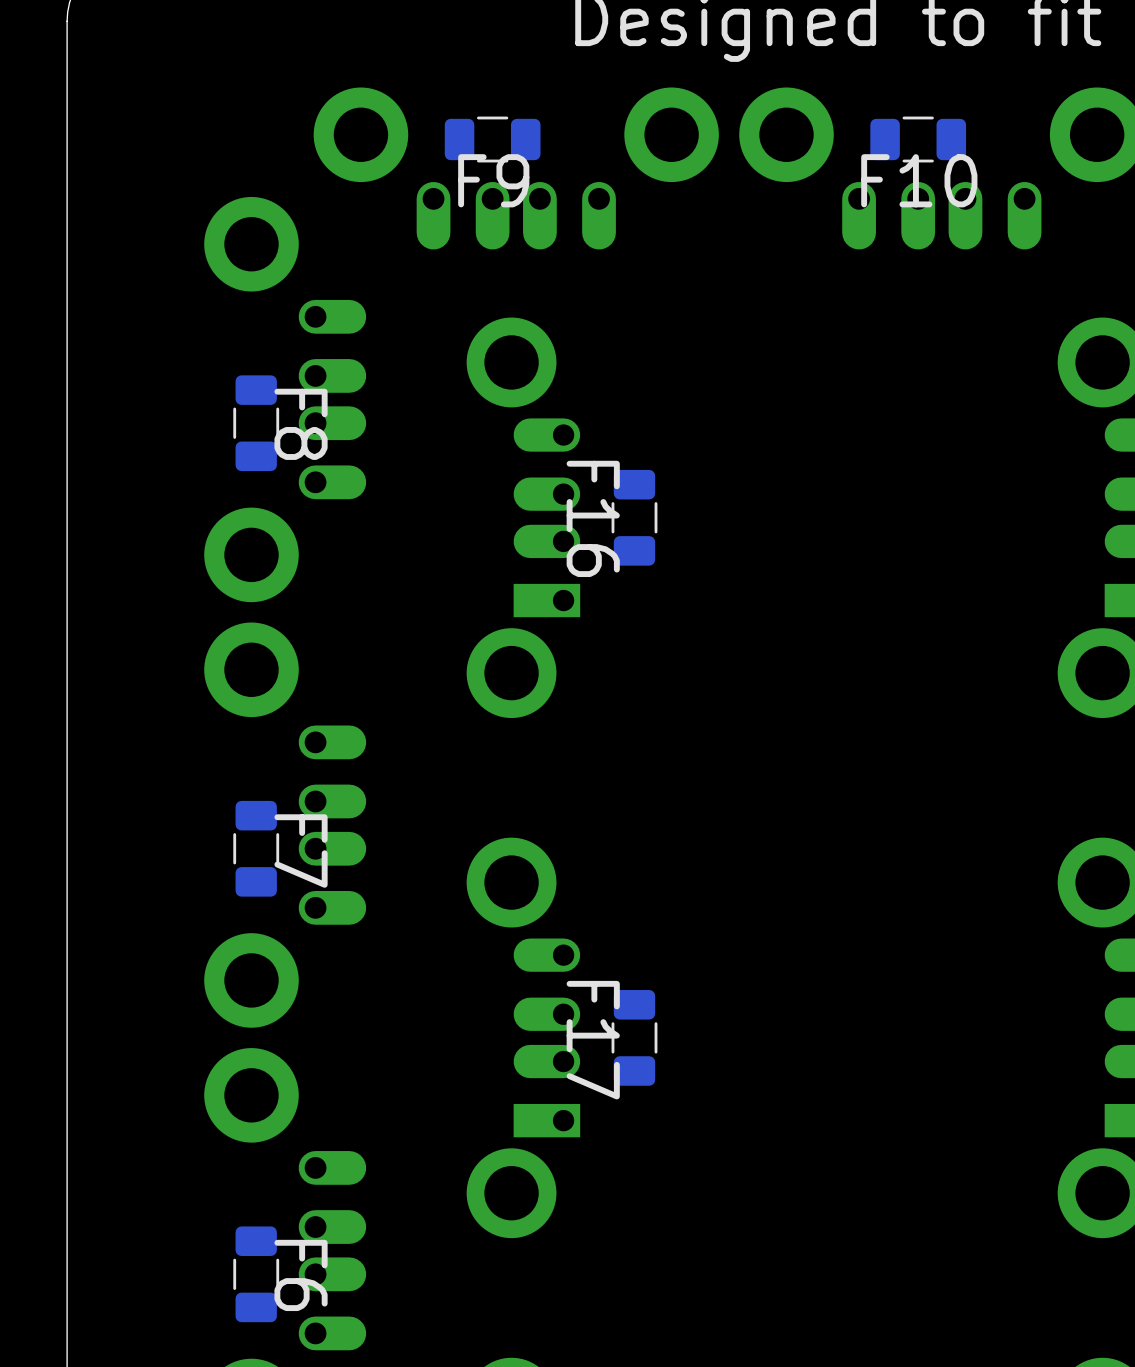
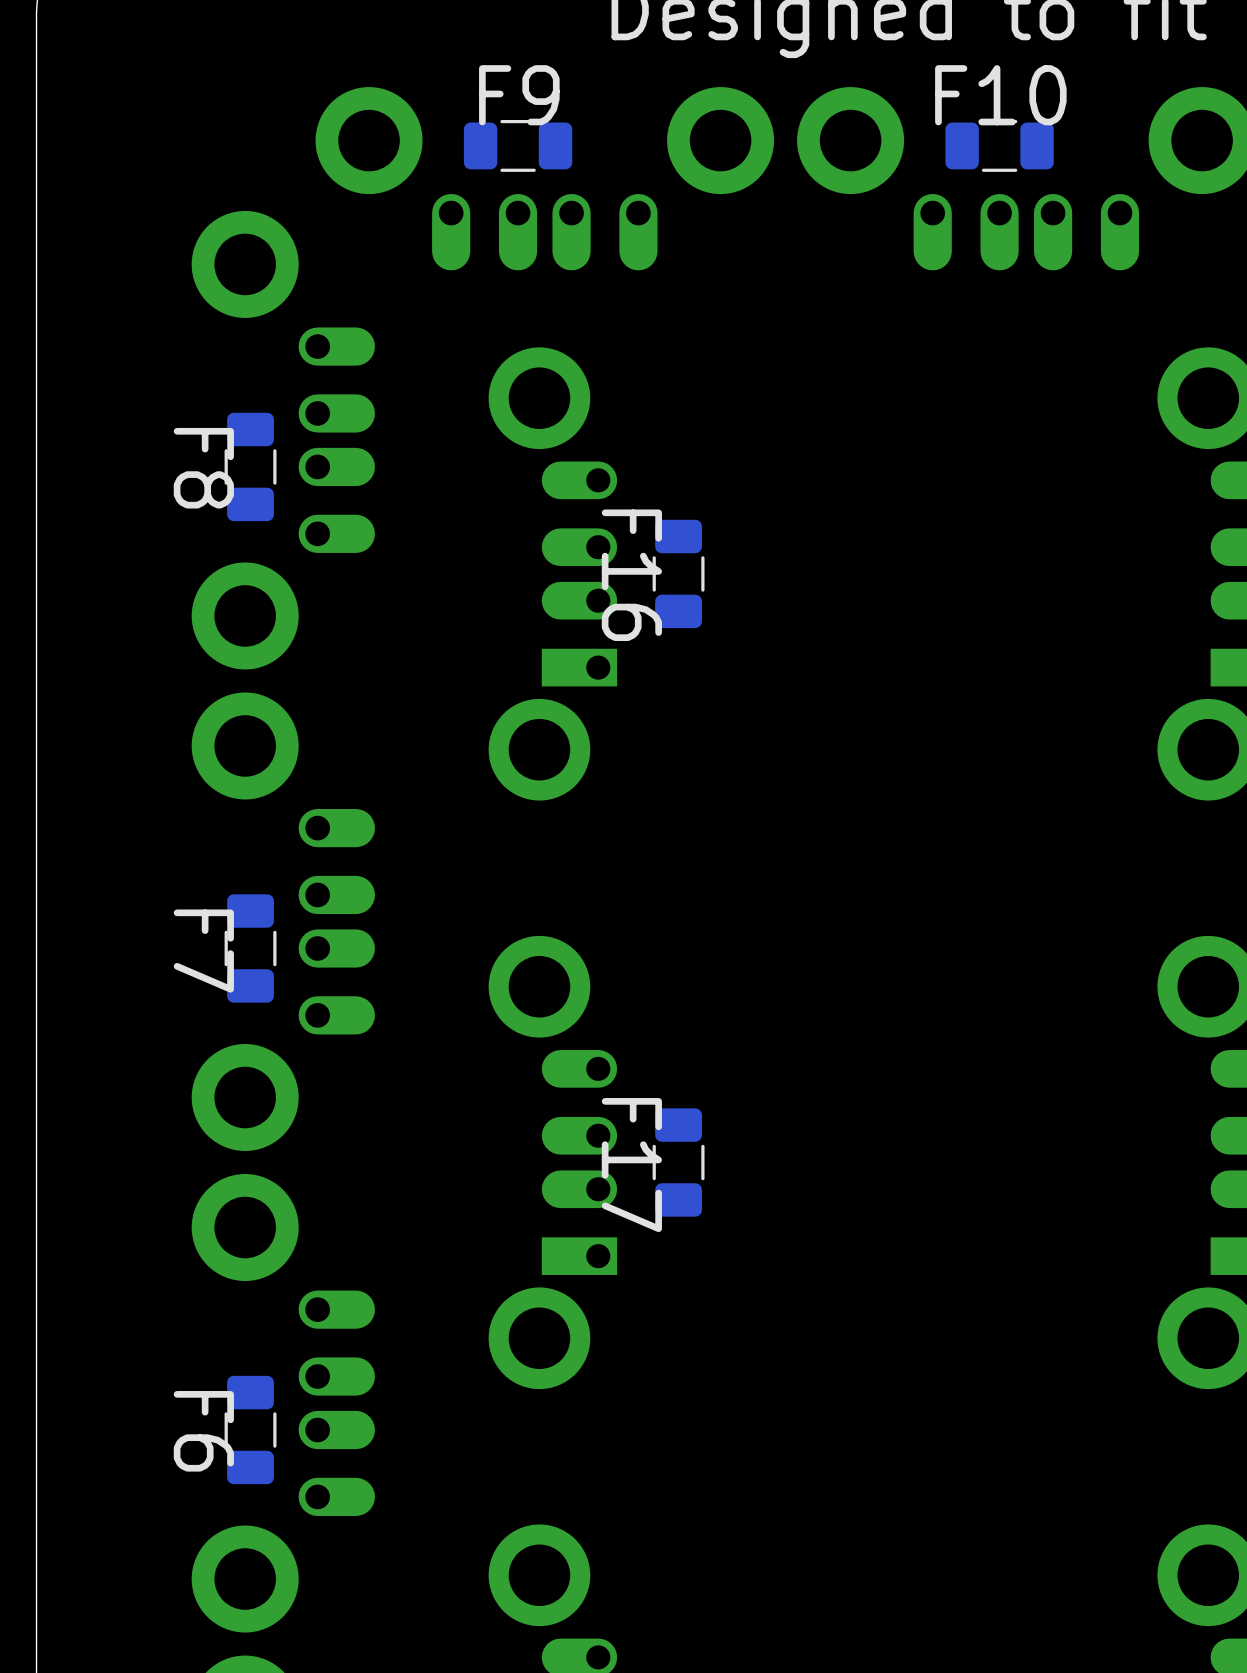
F9 name position: F9 (493, 180) -> F9 (519, 95)
F10 name position: F10 (919, 180) -> F10 (1000, 95)
F8 name position: F8 (301, 424) -> F8 (203, 468)
F7 name position: F7 (301, 851) -> F7 (203, 951)
F6 name position: F6 (301, 1275) -> F6 (203, 1431)

